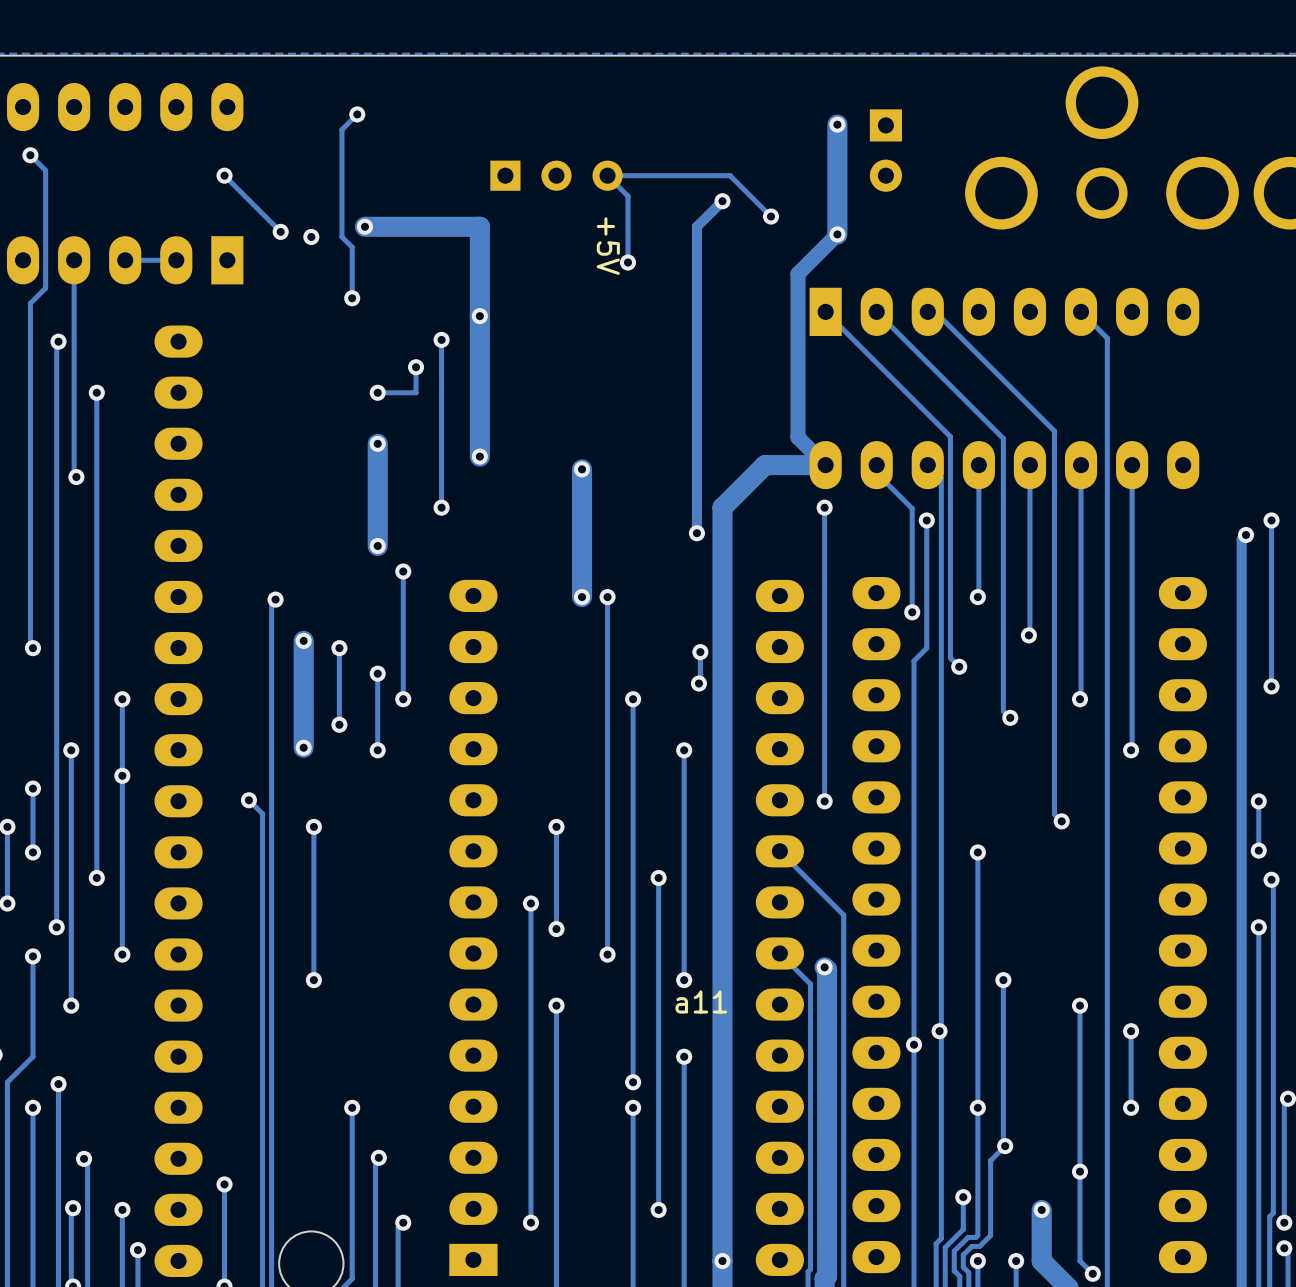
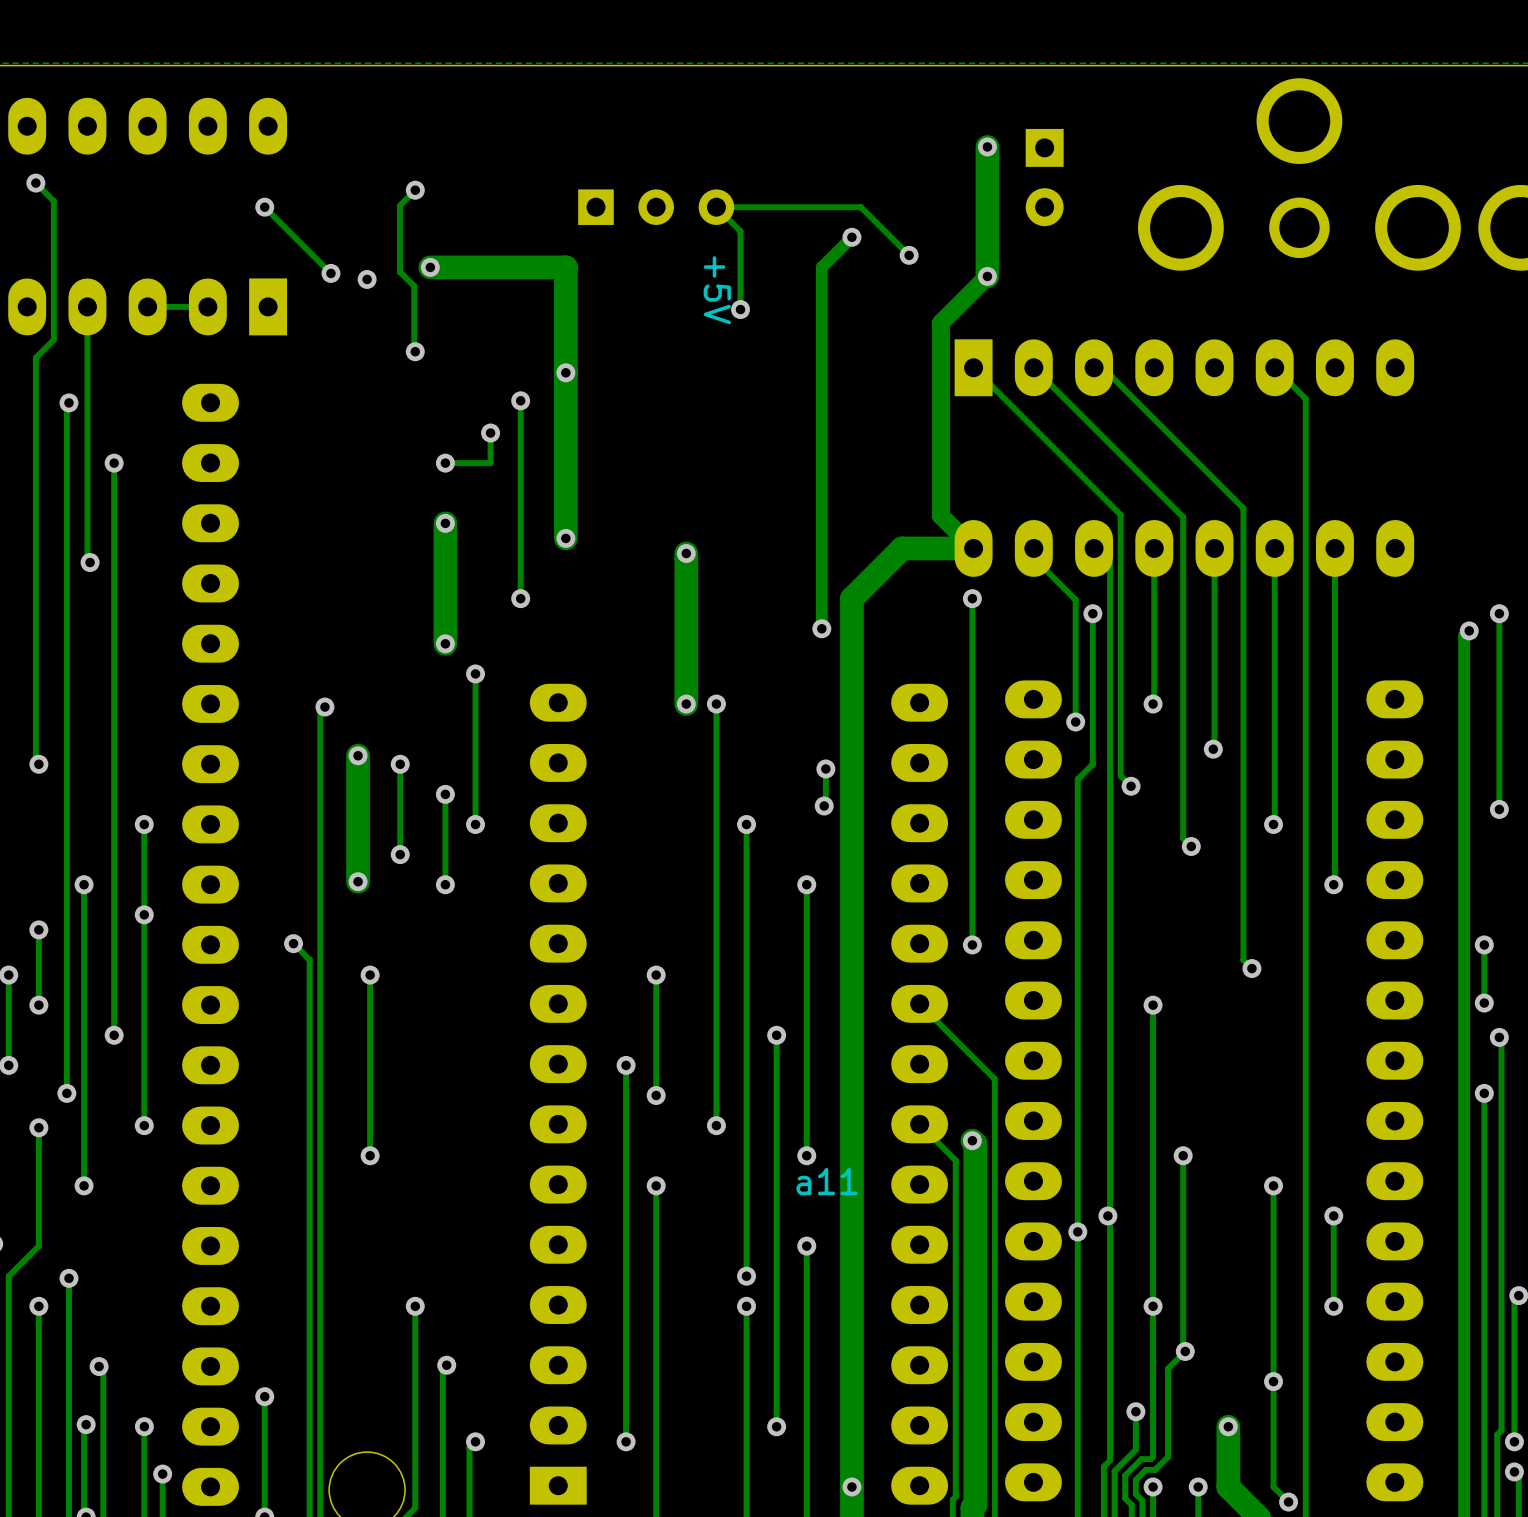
track: (357, 114) (341, 129) (341, 236) (352, 247) (352, 298) -> none
via position: (357, 114) -> (415, 190)
track: none -> (415, 190) (400, 205) (400, 271) (414, 286) (414, 357)

